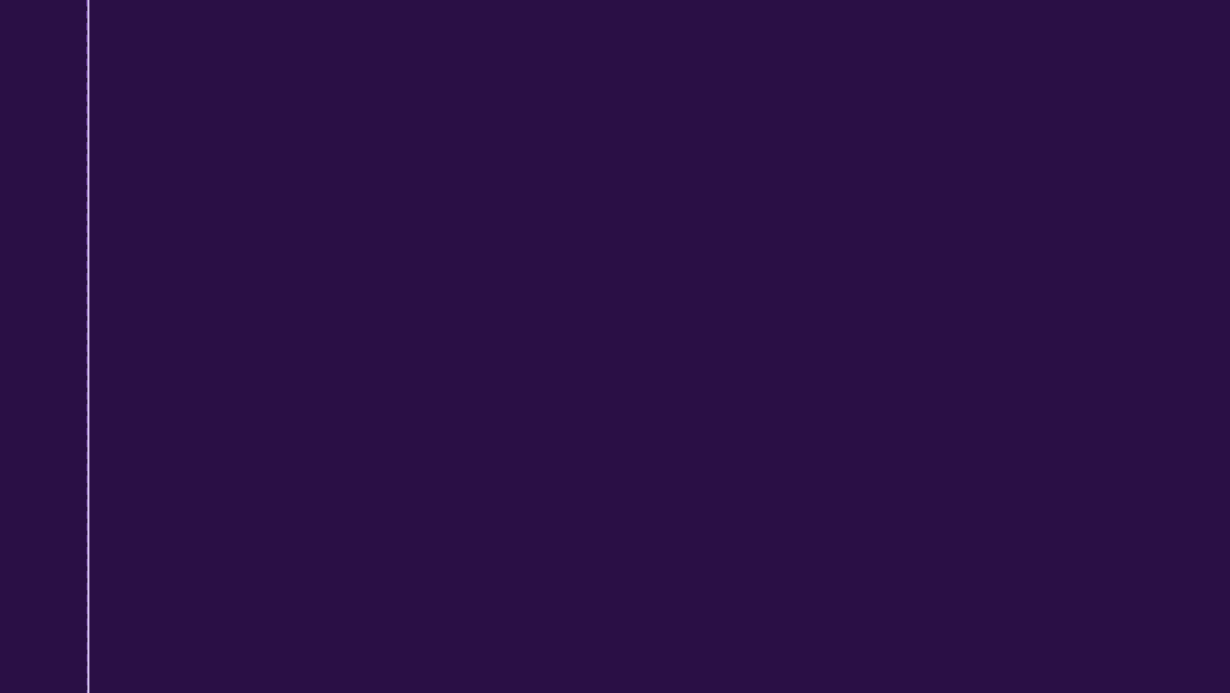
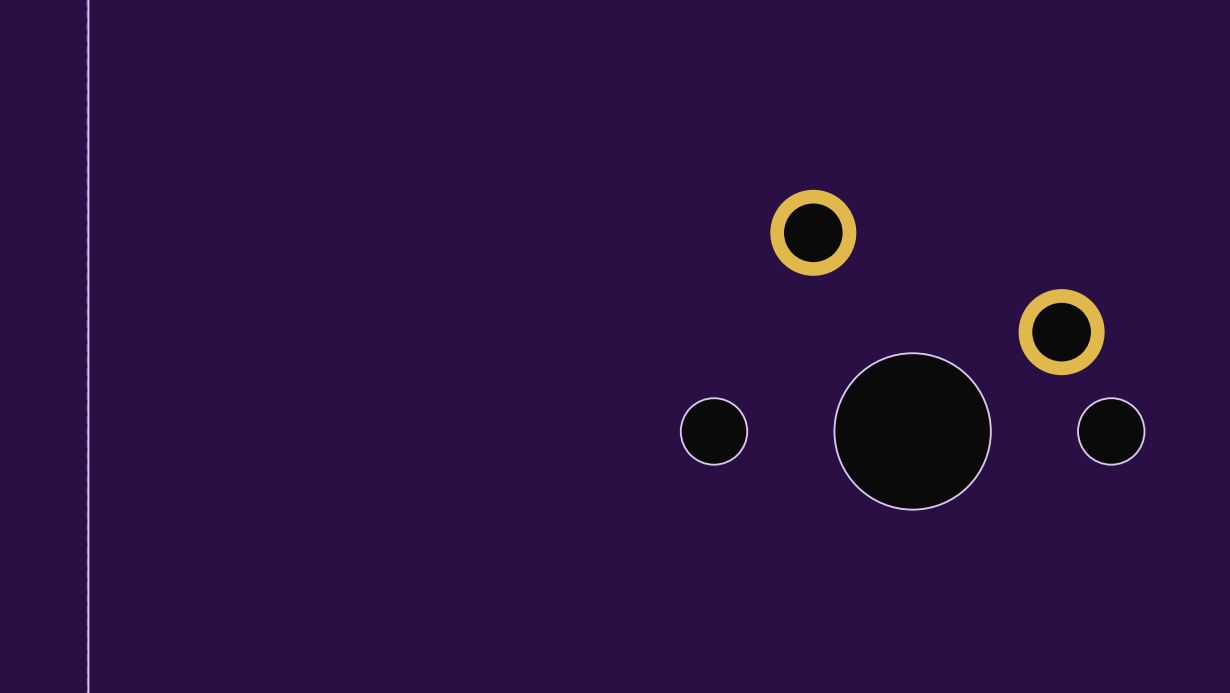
part: none -> (912, 349)

